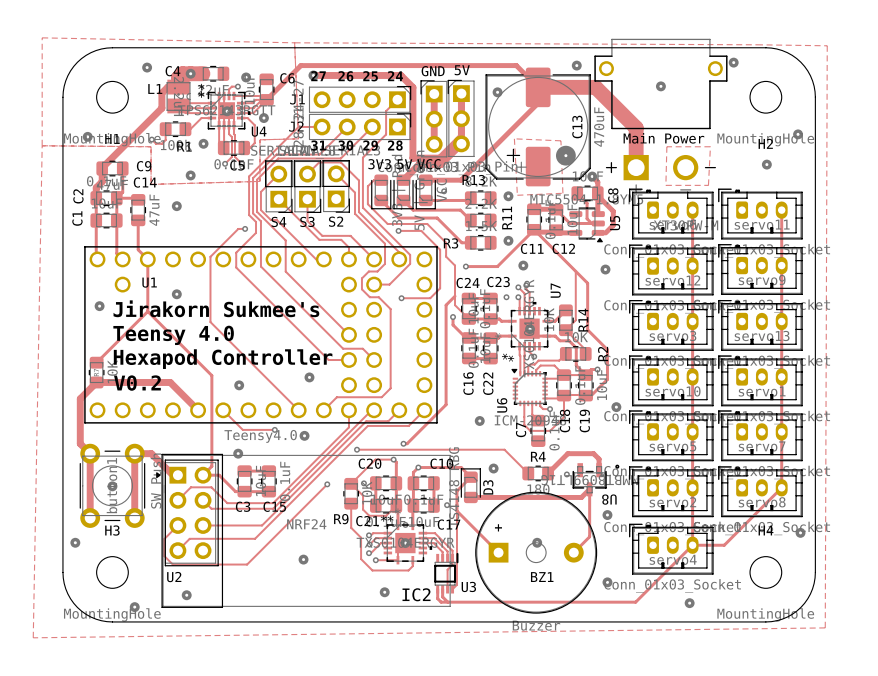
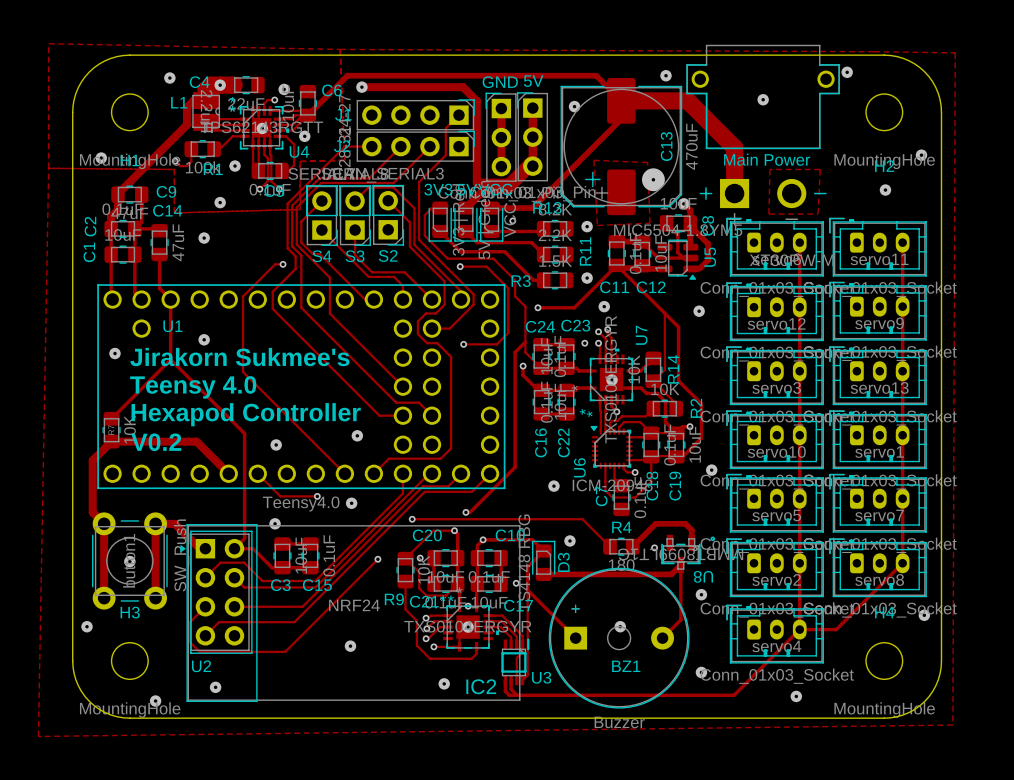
text: 27 (318, 76) -> none
text: 26 (345, 76) -> none
text: 25 (370, 76) -> none
text: 24 (395, 76) -> none
text: 31 (318, 145) -> none
text: 30 (345, 145) -> none
text: 29 (370, 145) -> none
text: 28 (395, 145) -> none

